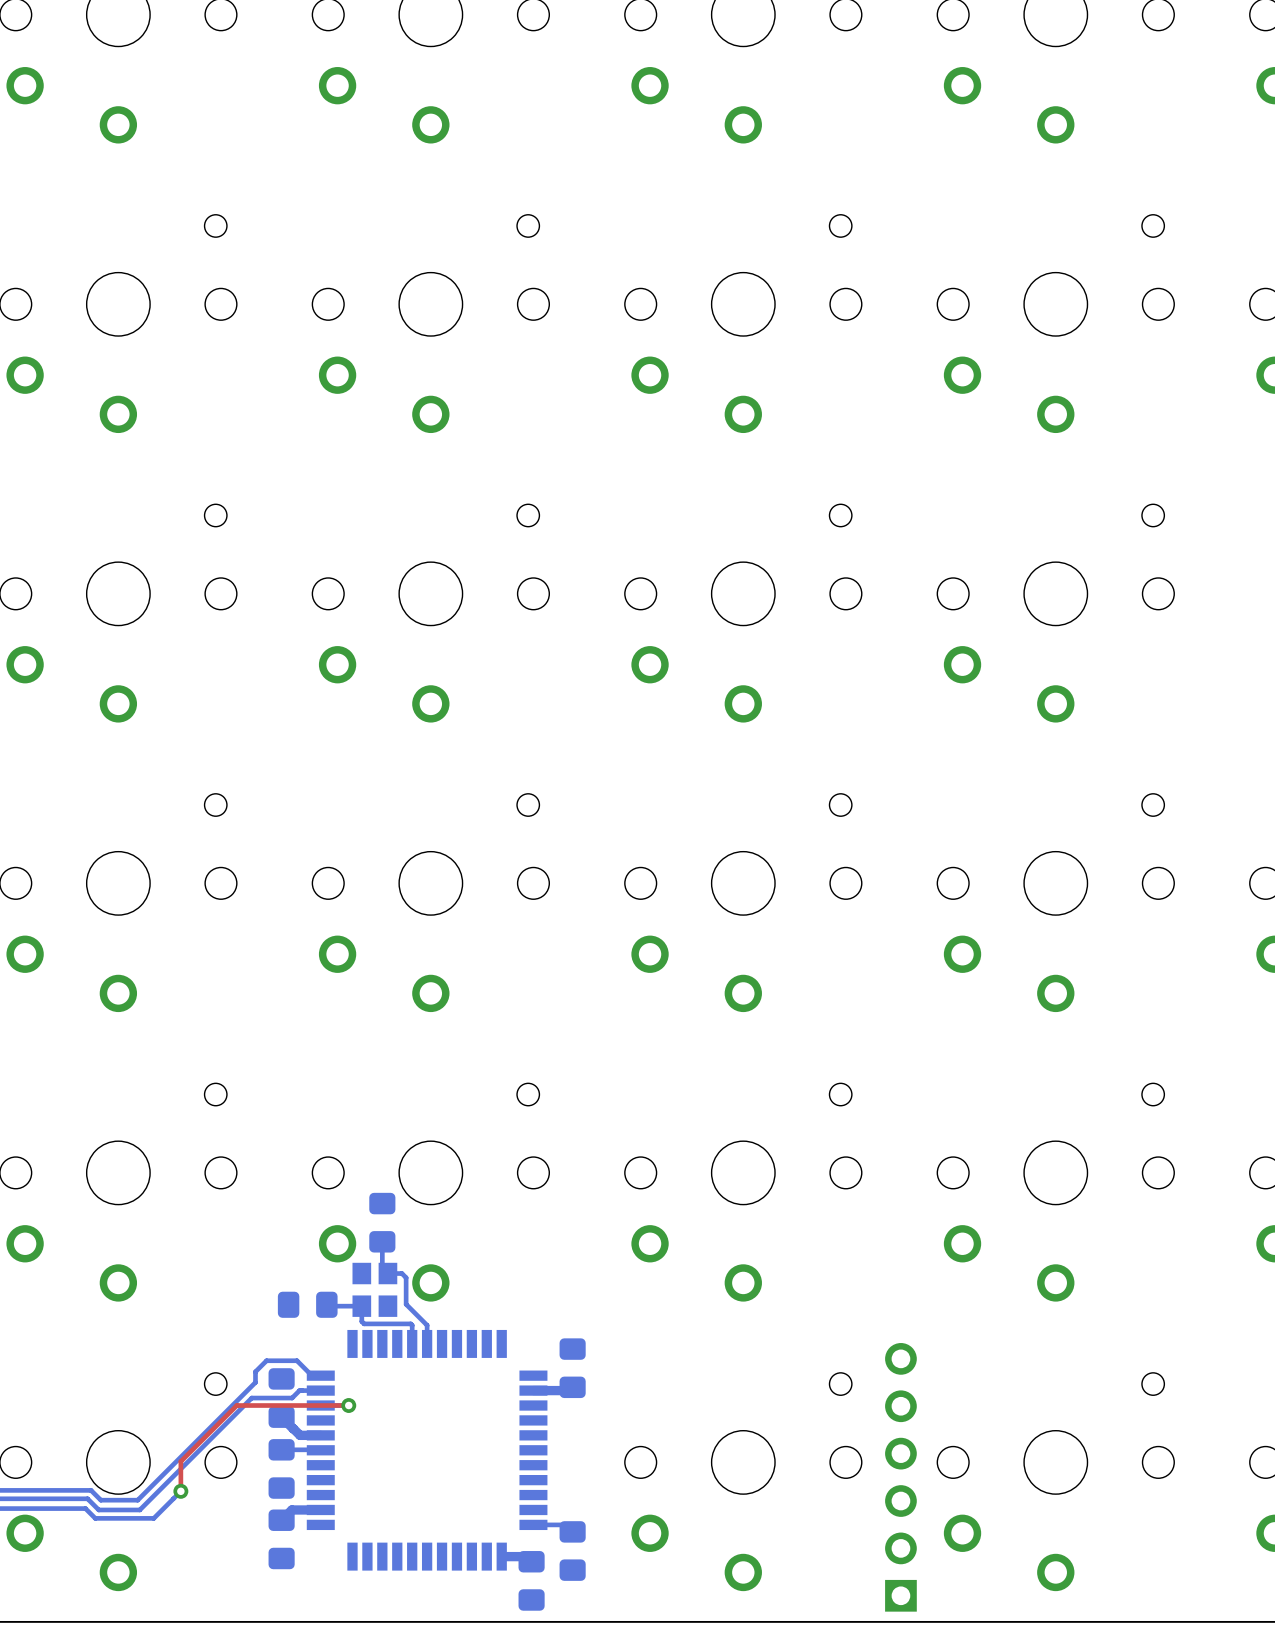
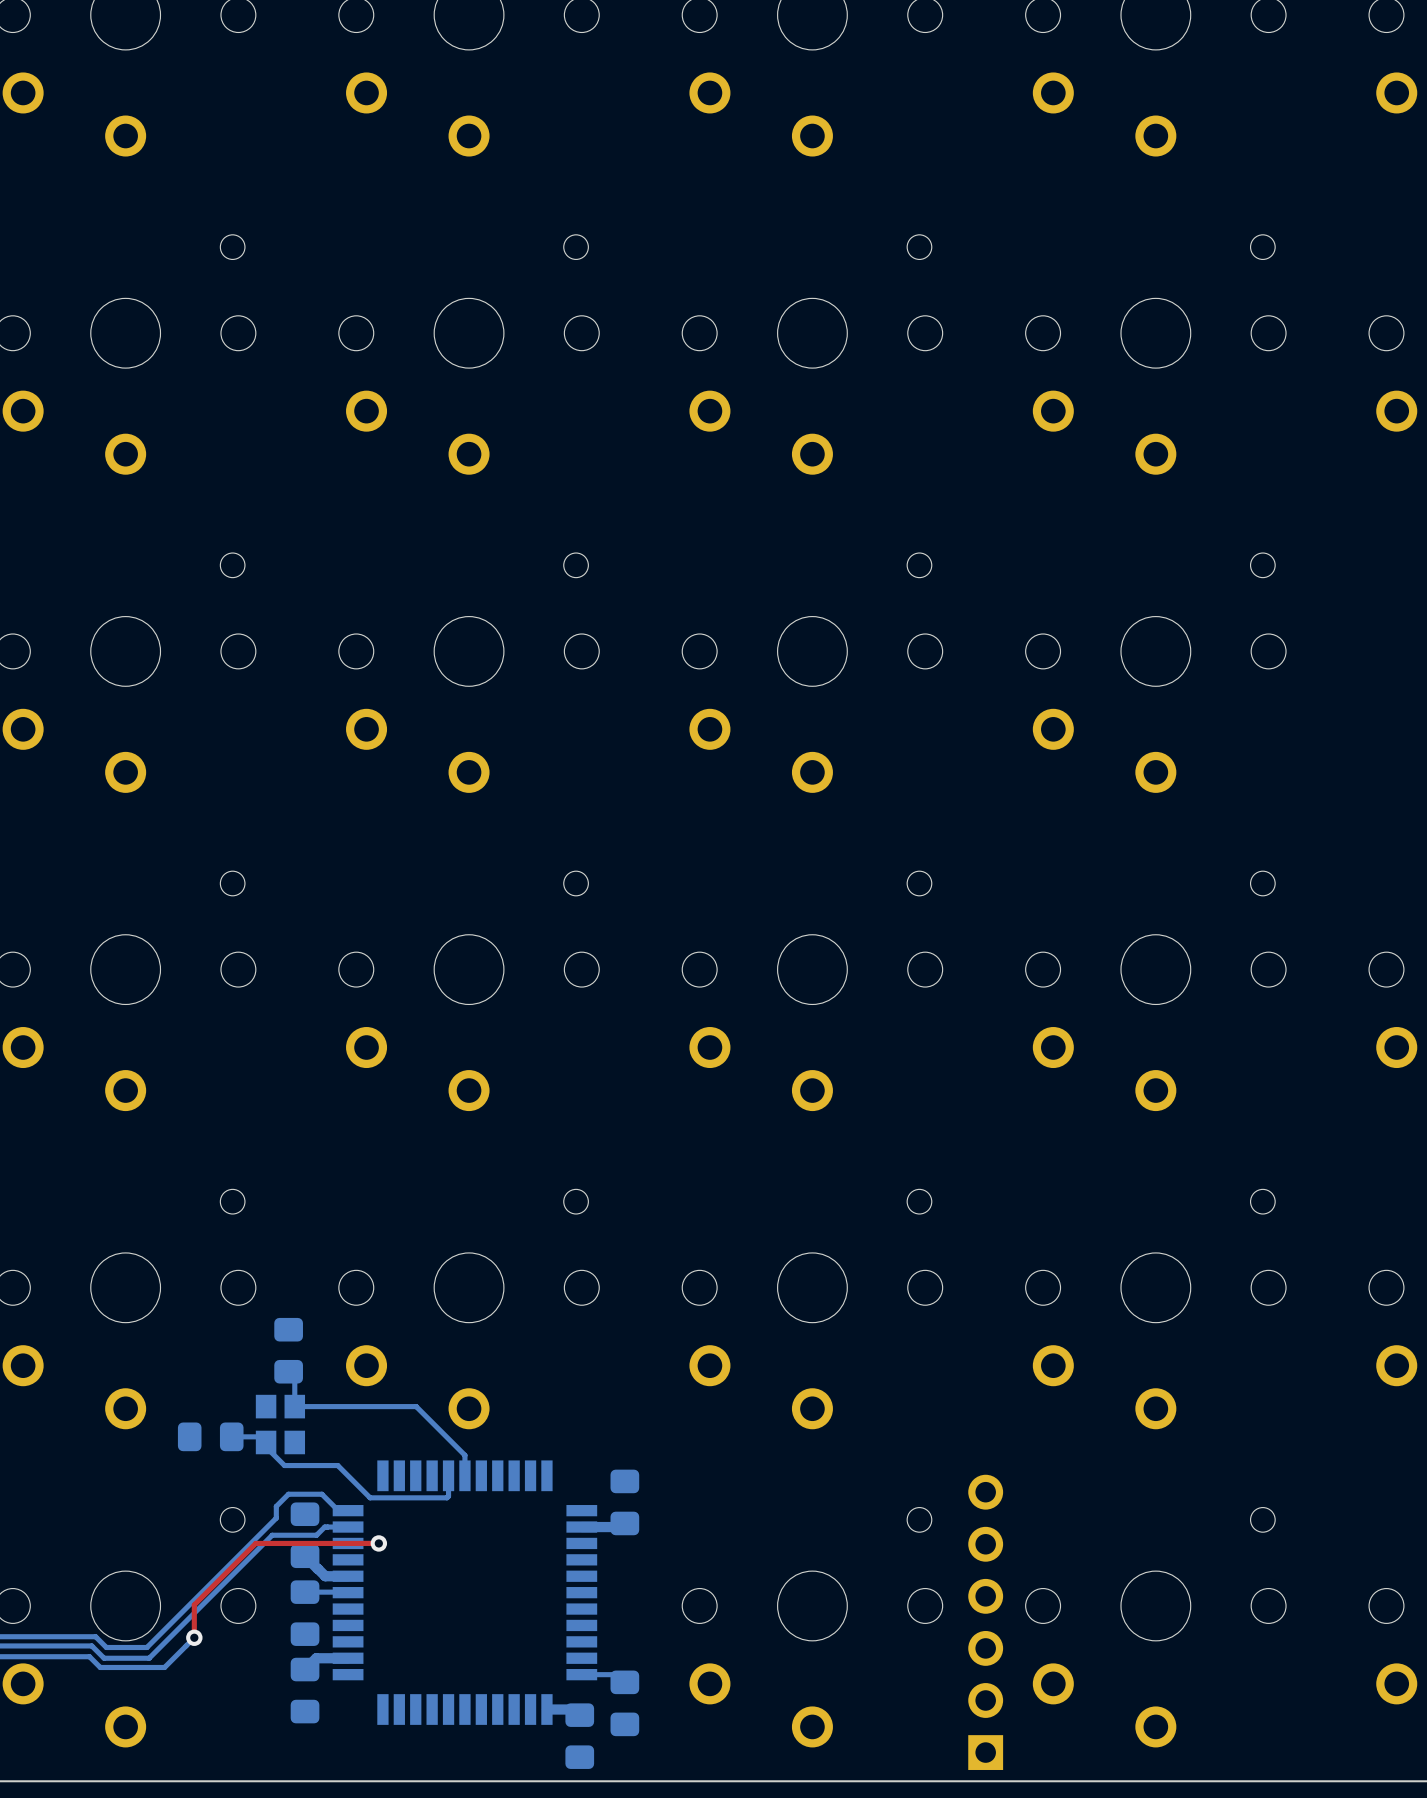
part: (382, 1222) -> none
part: none -> (288, 1350)
bottom track: (382, 1241) (382, 1267) (387, 1273) (401, 1273) (406, 1277) (406, 1304) -> (294, 1377) (294, 1406) (416, 1406) (441, 1432)
part position: (374, 1289) -> (280, 1424)
part: (307, 1304) -> none
bottom track: (326, 1304) (361, 1306) (361, 1321) (364, 1323) (410, 1323) (412, 1343) -> (231, 1436) (260, 1436) (266, 1442) (266, 1447) (284, 1465) (337, 1465) (370, 1497) (447, 1497) (448, 1475)
part: none -> (210, 1436)

